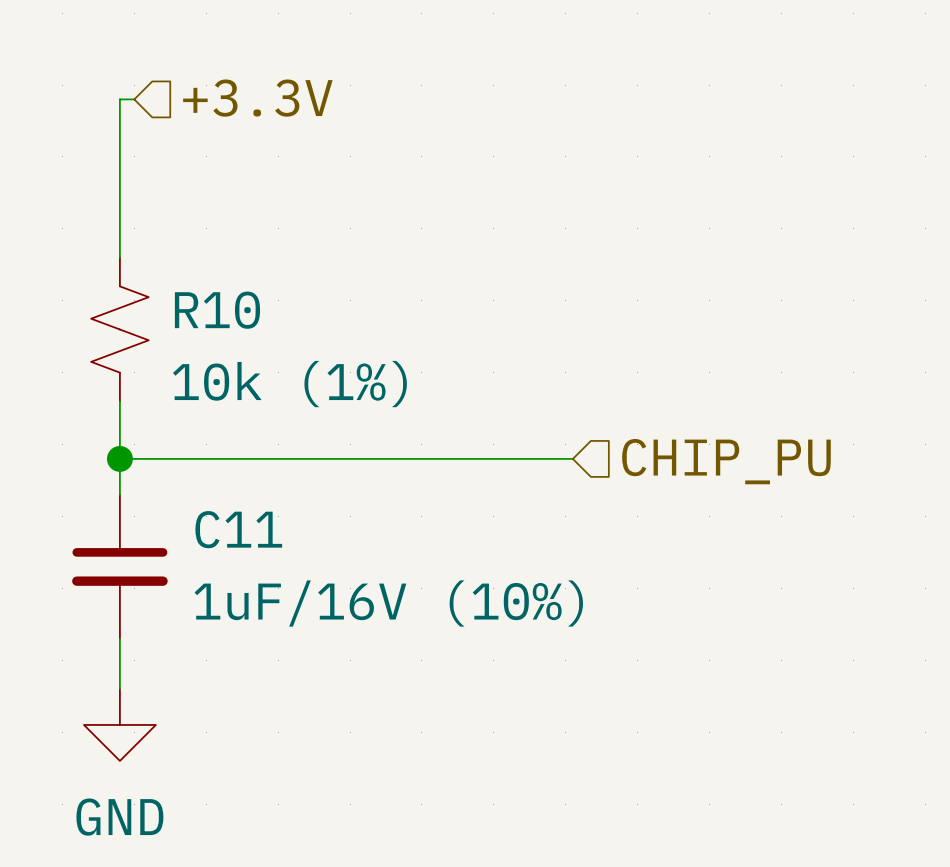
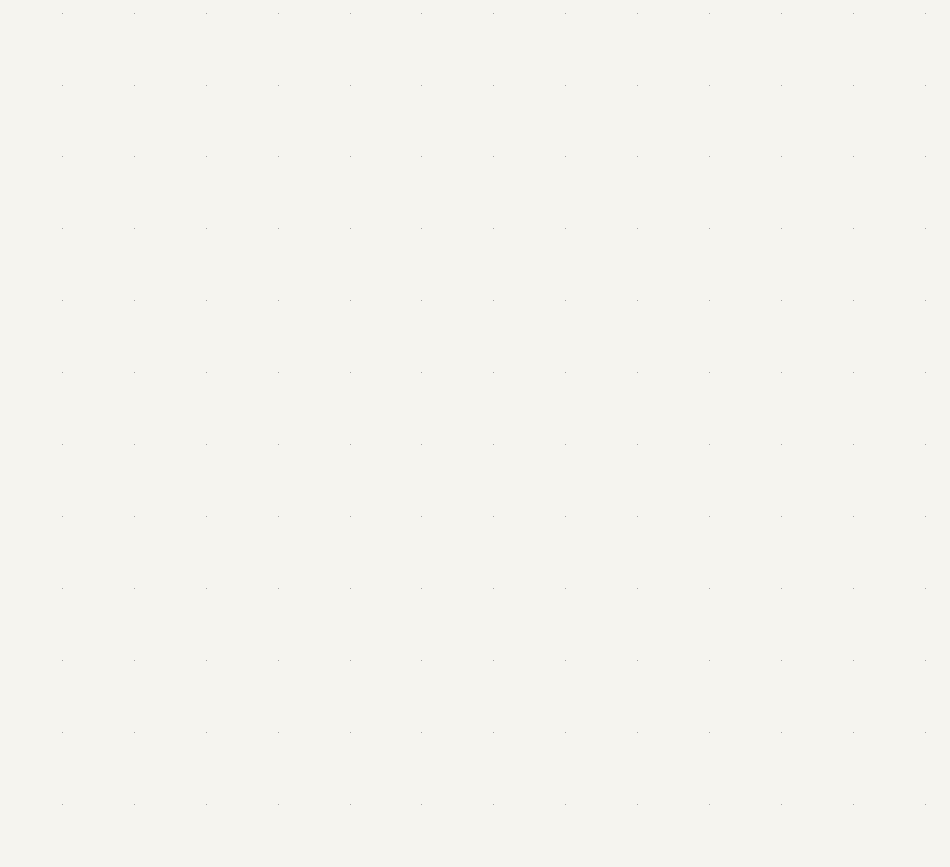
hierarchical label: +3.3V (257, 98) -> none
wire: (134, 99) (119, 99) (119, 257) -> none
R10: 10k (1%) (119, 329) -> none
wire: (119, 401) (119, 494) -> none
wire: (119, 458) (572, 458) -> none
junction: (119, 458) -> none
hierarchical label: CHIP_PU (726, 461) -> none
C11: 1uF/16V (10%) (119, 566) -> none
wire: (119, 638) (119, 689) -> none
power symbol: GND (119, 724) -> none

